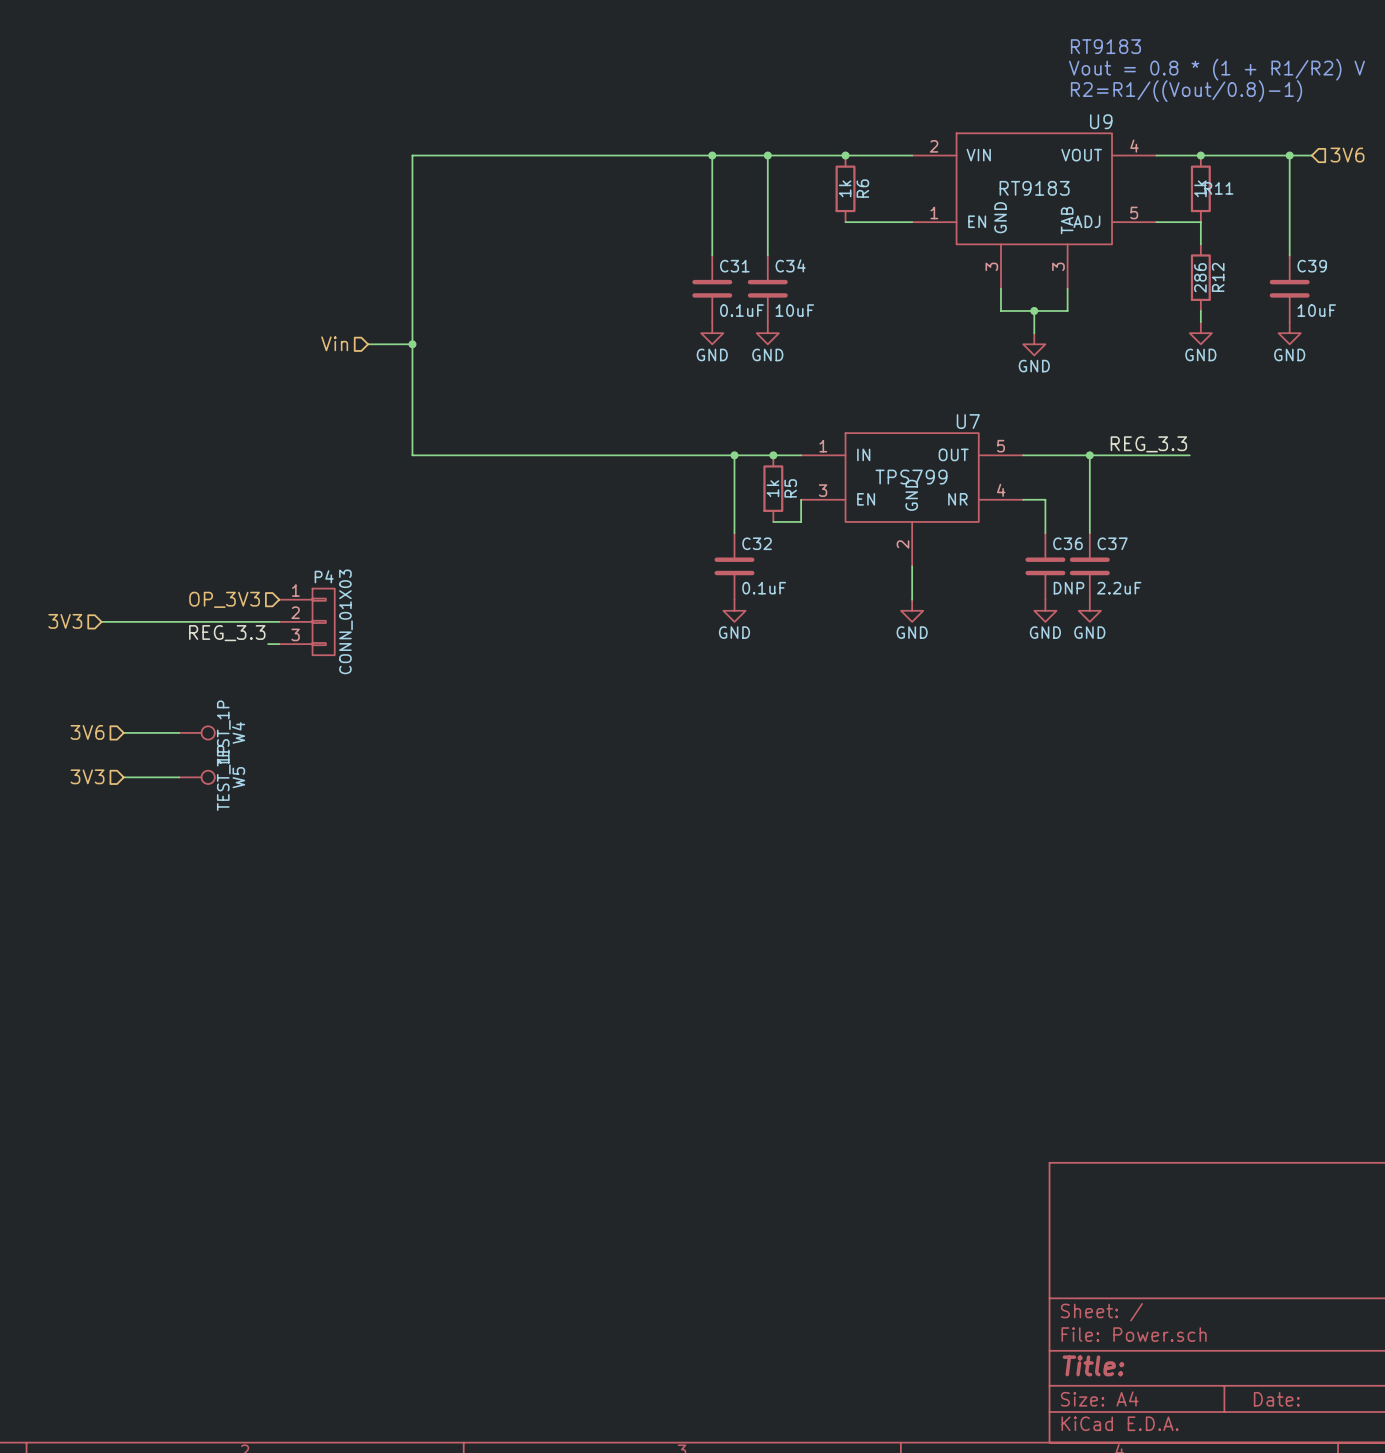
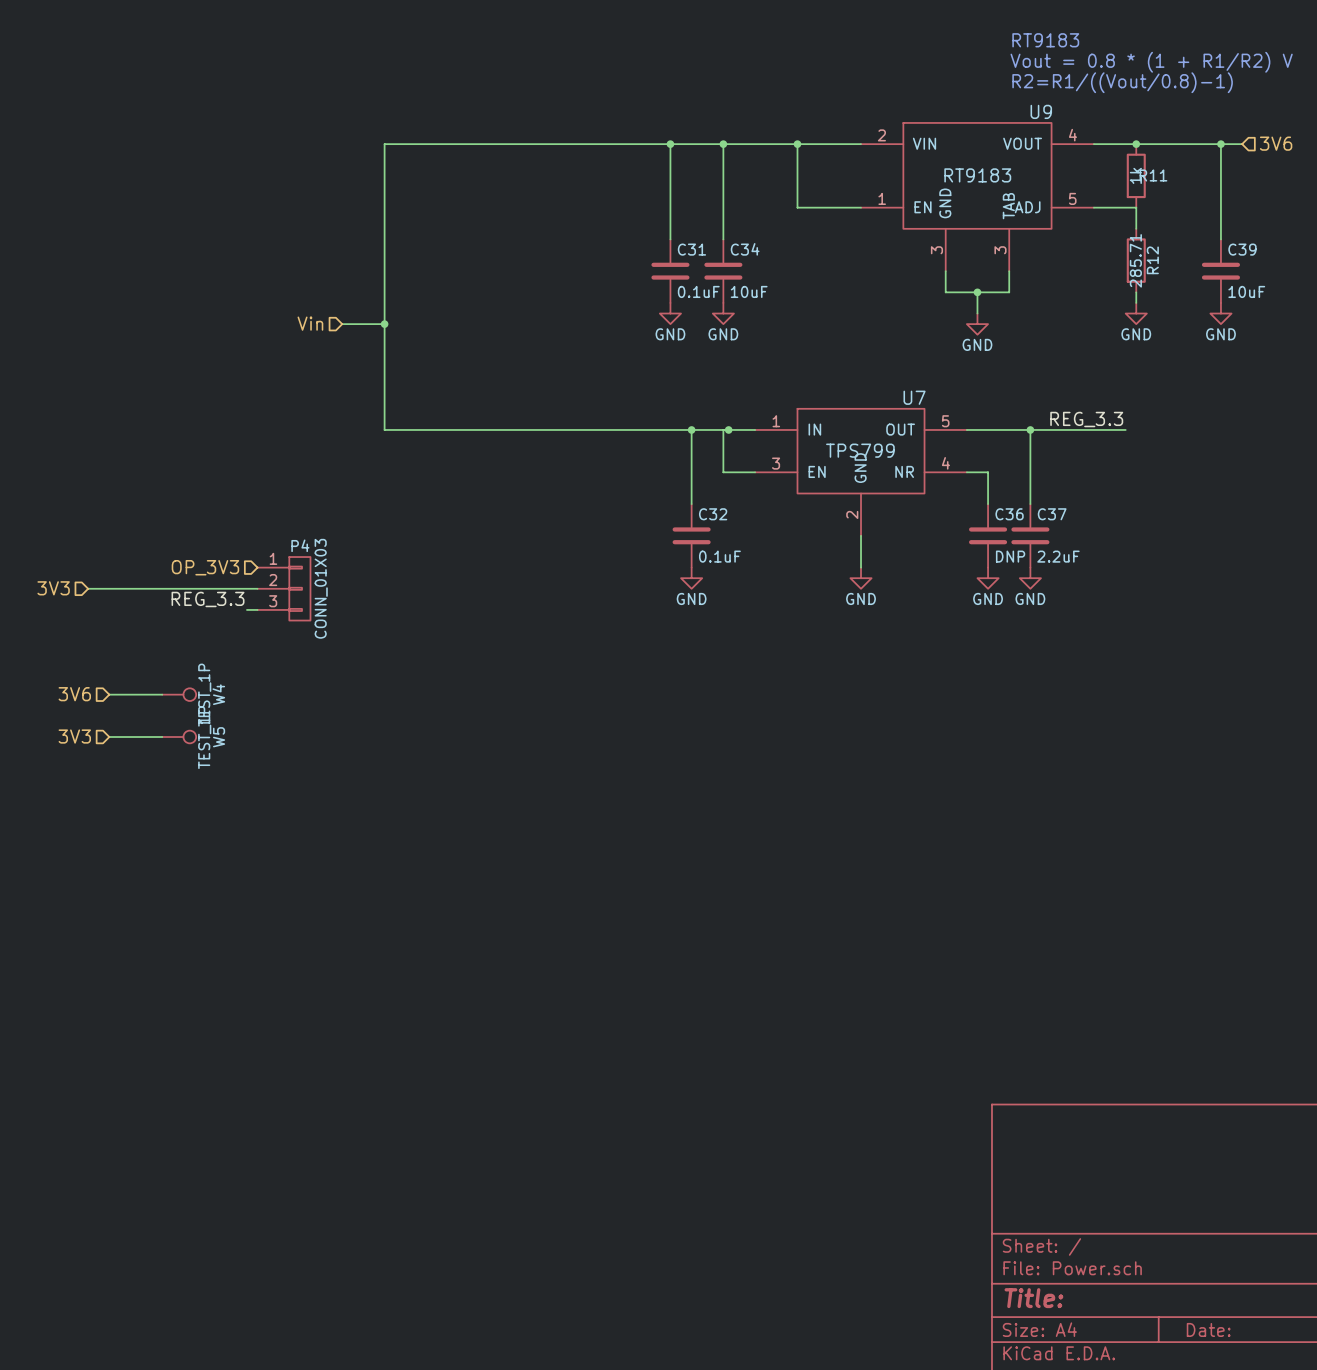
wire: none -> (797, 144) (797, 207)
R6: 1k (845, 188) -> none
R12 value: 286 (1200, 277) -> 285.71 (1135, 260)
R5: 1k (773, 488) -> none
wire: (801, 499) (801, 521) (773, 521) -> (755, 472) (723, 472) (723, 429)

